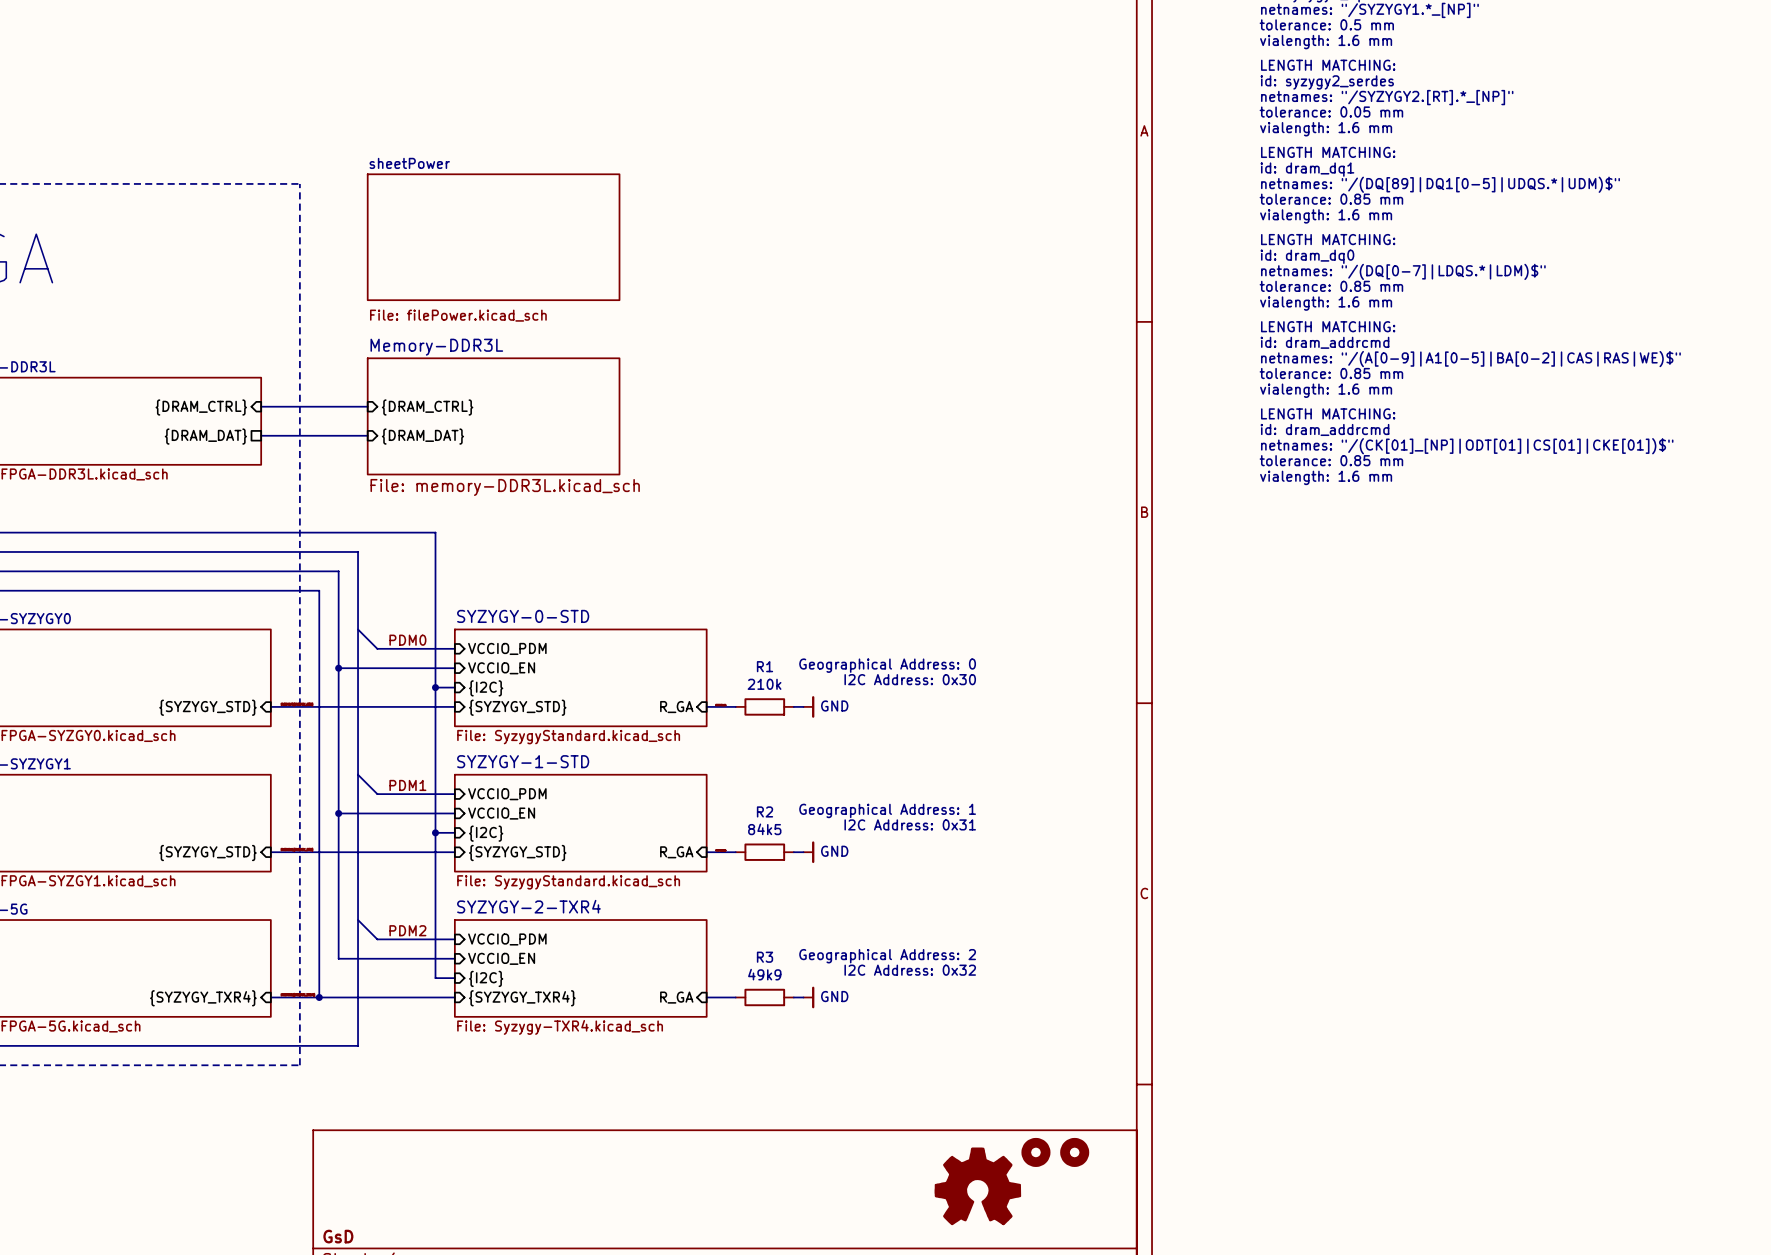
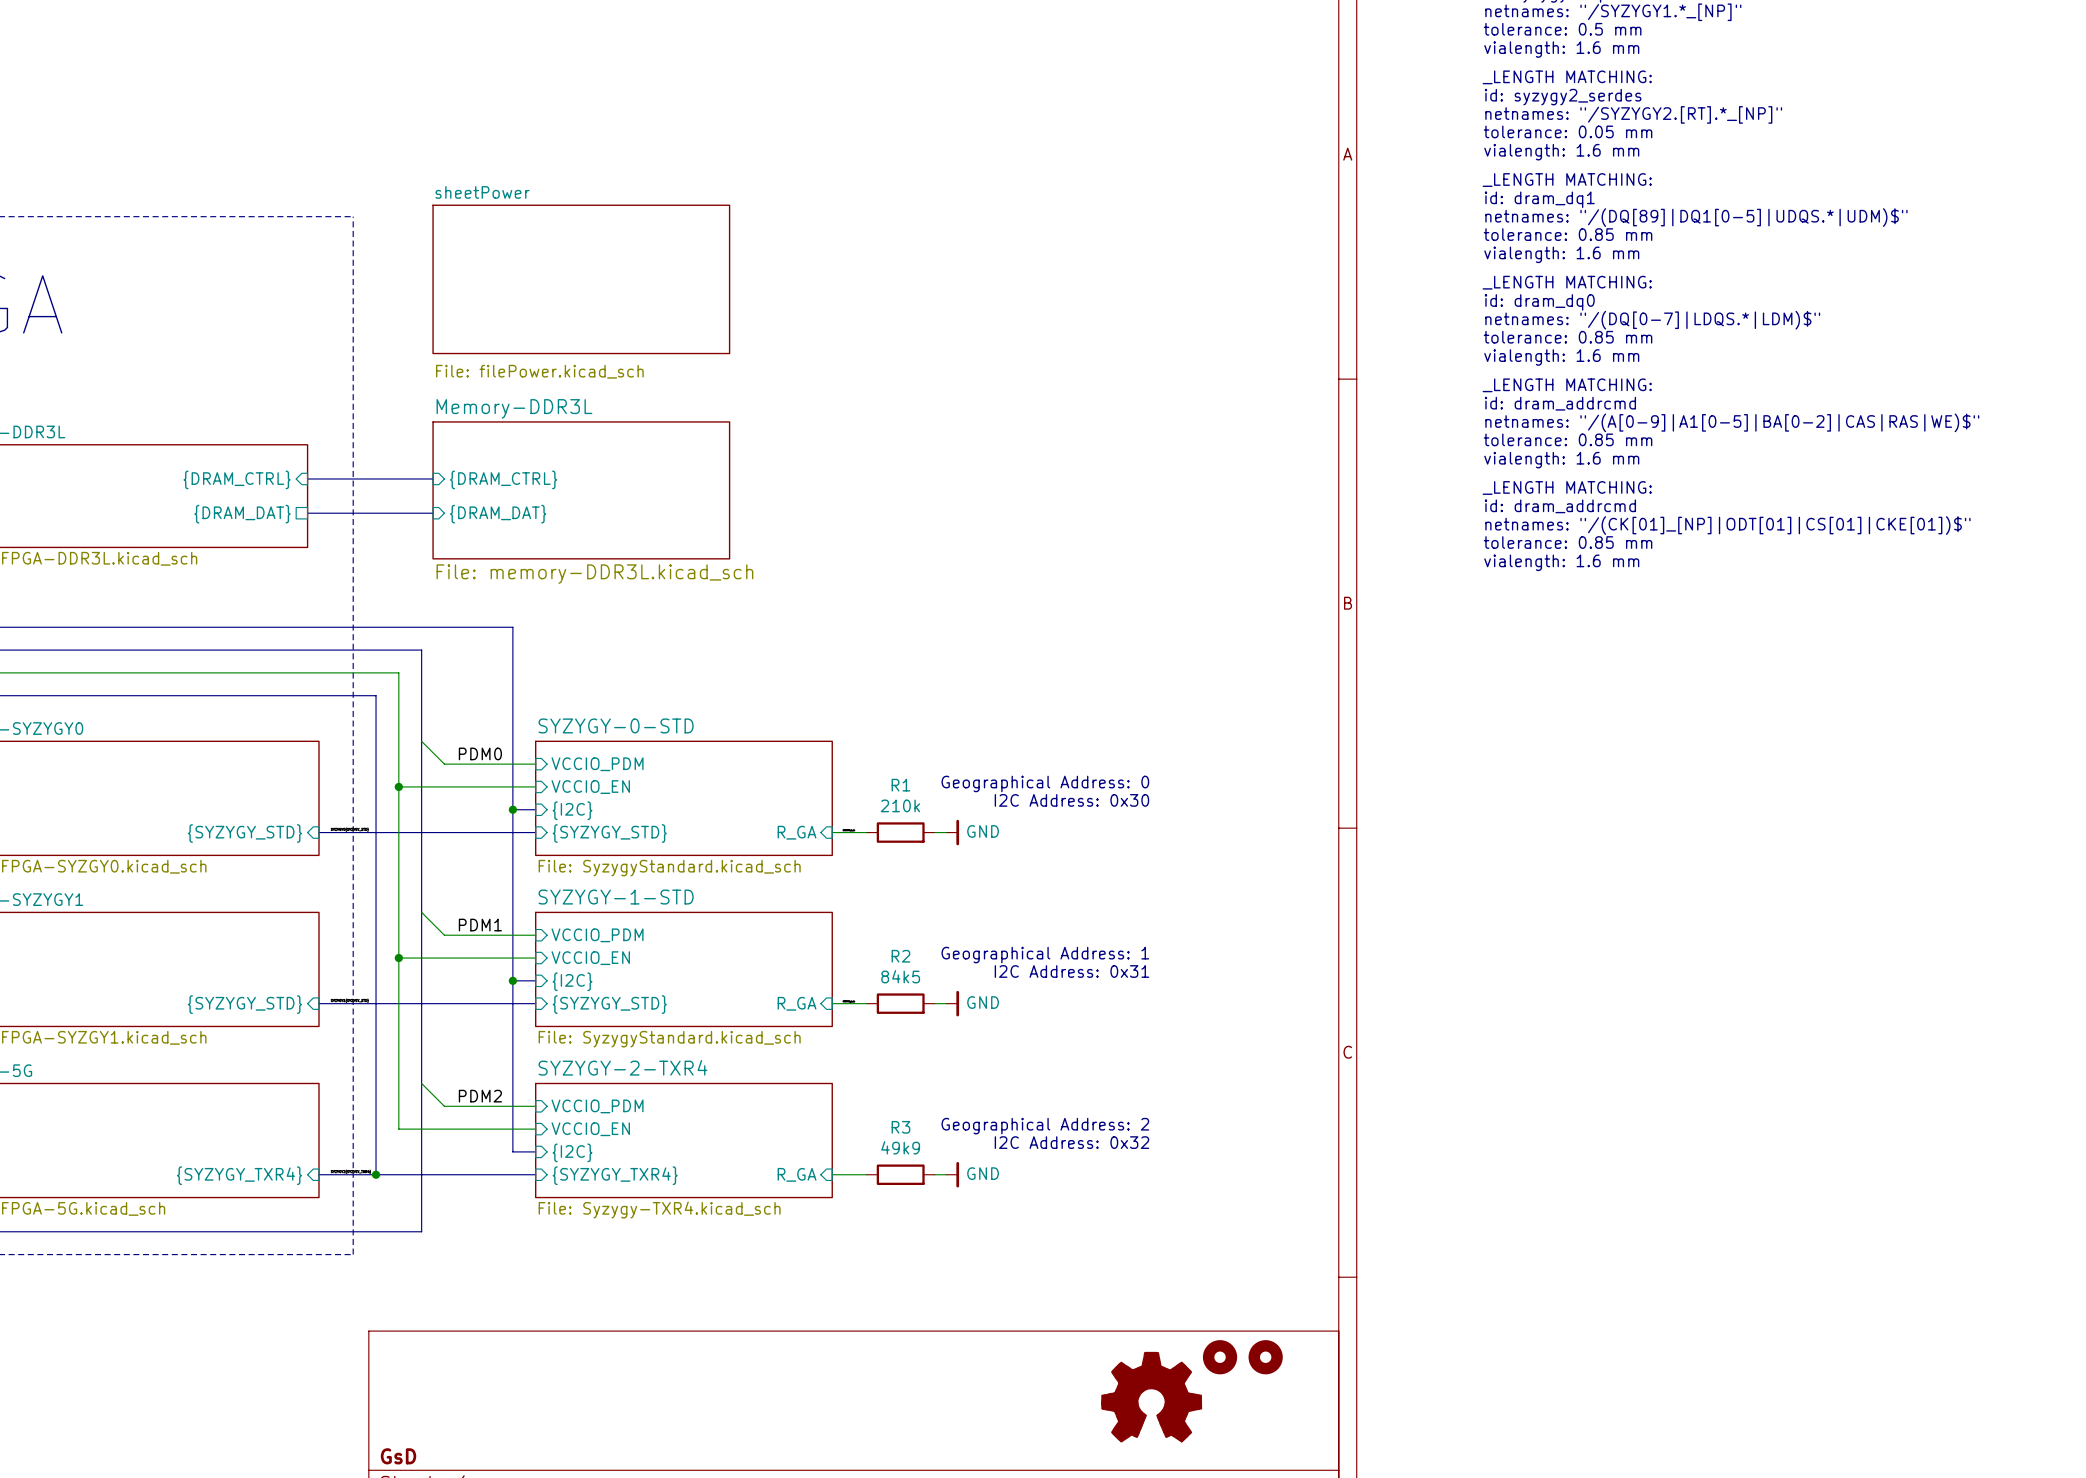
text: LENGTH MATCHING: (1328, 65) -> _LENGTH MATCHING: (1567, 77)
text: LENGTH MATCHING: (1328, 152) -> _LENGTH MATCHING: (1567, 180)
text: LENGTH MATCHING: (1328, 239) -> _LENGTH MATCHING: (1567, 282)
text: LENGTH MATCHING: (1328, 326) -> _LENGTH MATCHING: (1567, 385)
text: LENGTH MATCHING: (1328, 413) -> _LENGTH MATCHING: (1567, 487)

